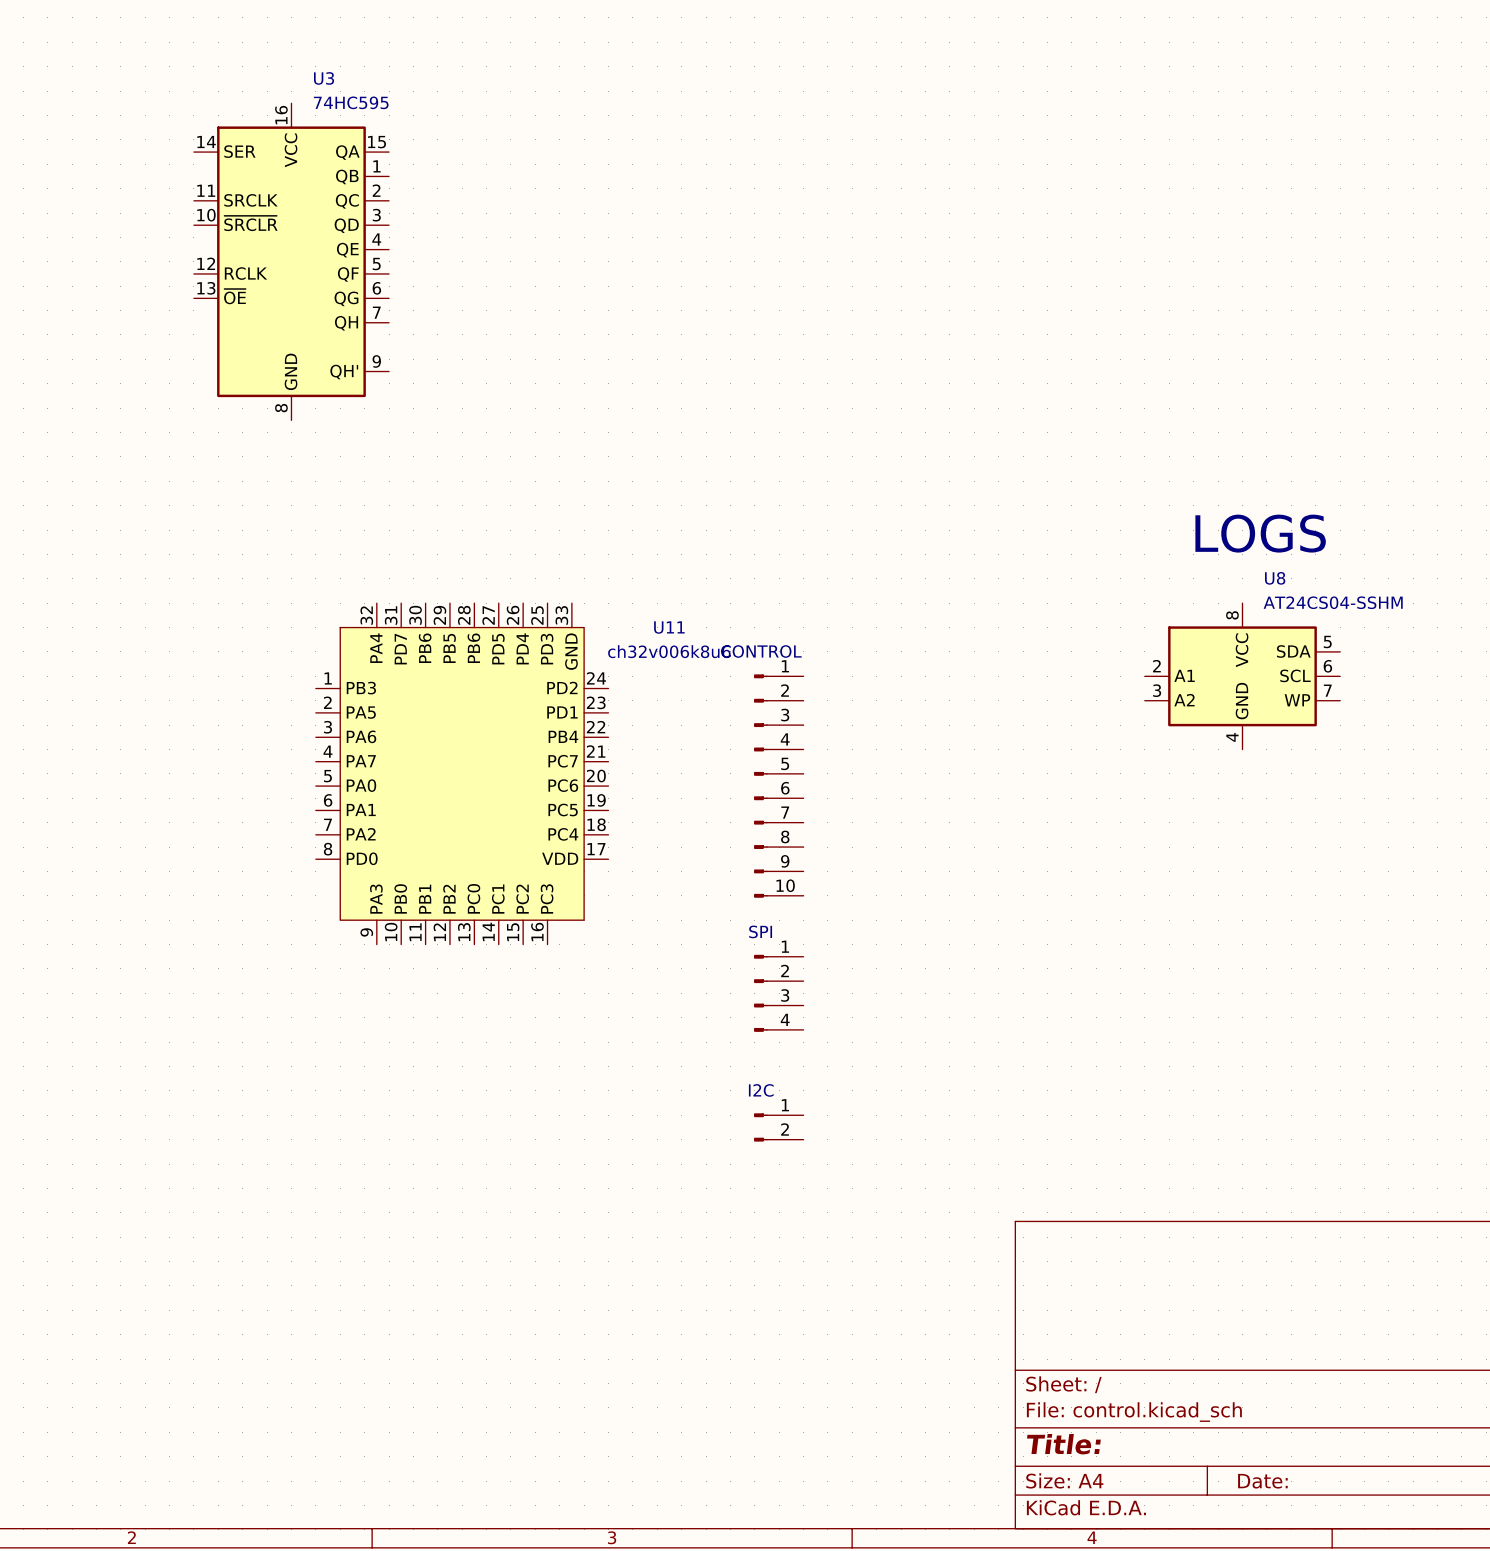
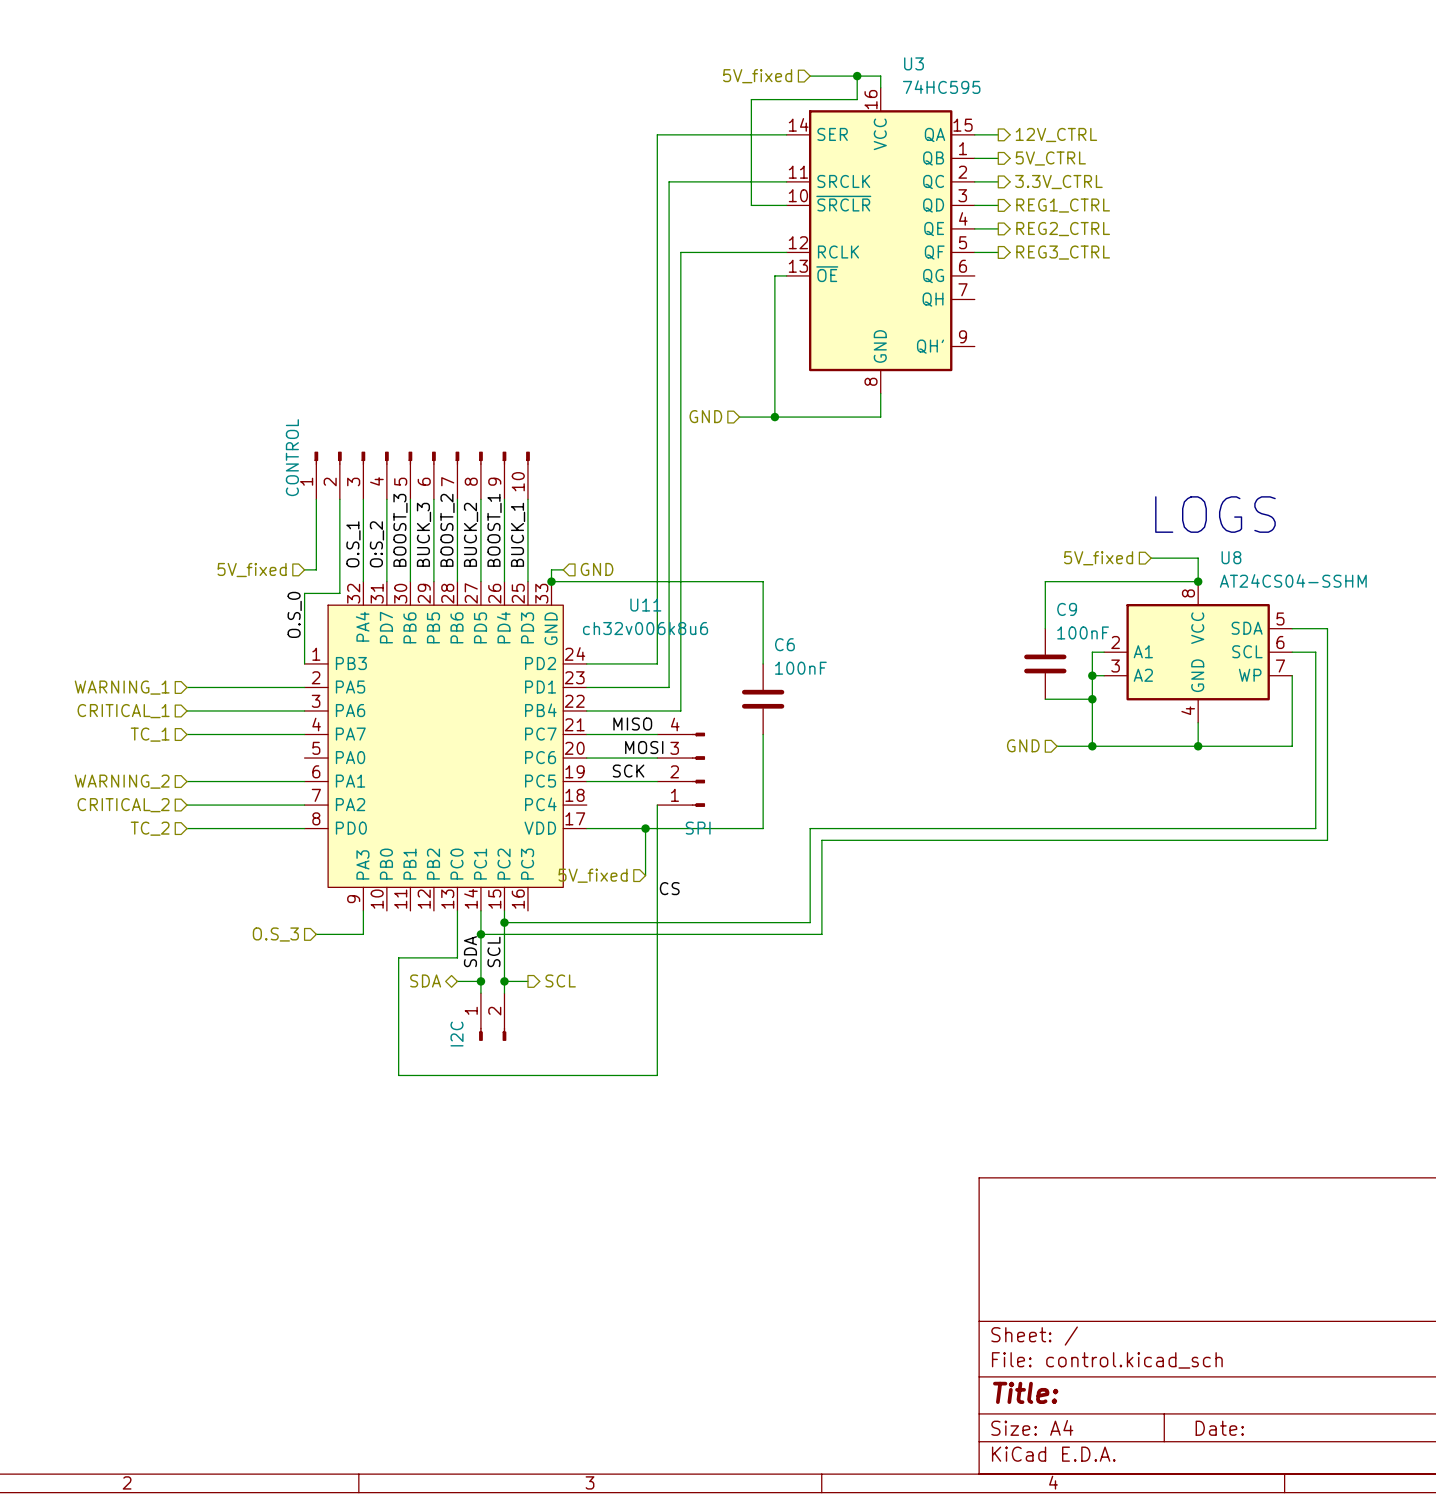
wire: none -> (810, 76) (880, 76) (880, 87)
wire: none -> (857, 76) (857, 99) (751, 99) (751, 205) (786, 205)
junction: none -> (857, 76)
hierarchical label: none -> 5V_fixed (757, 76)
wire: none -> (786, 134) (657, 134) (657, 663) (586, 663)
wire: none -> (974, 134) (998, 134)
hierarchical label: none -> 12V_CTRL (1056, 134)
wire: none -> (974, 158) (998, 158)
hierarchical label: none -> 5V_CTRL (1050, 158)
wire: none -> (786, 181) (669, 181) (669, 687) (586, 687)
wire: none -> (974, 181) (998, 181)
hierarchical label: none -> 3.3V_CTRL (1058, 182)
wire: none -> (974, 205) (998, 205)
hierarchical label: none -> REG1_CTRL (1063, 205)
wire: none -> (974, 228) (998, 228)
hierarchical label: none -> REG2_CTRL (1063, 229)
U3 position: (291, 261) -> (880, 240)
wire: none -> (786, 252) (680, 252) (680, 710) (586, 710)
wire: none -> (974, 252) (998, 252)
hierarchical label: none -> REG3_CTRL (1063, 252)
wire: none -> (786, 275) (774, 275) (774, 417)
wire: none -> (880, 393) (880, 417) (739, 417)
hierarchical label: none -> GND (705, 416)
junction: none -> (774, 417)
part: none -> CONTROL (422, 475)
wire: none -> (316, 499) (316, 569) (304, 569)
wire: none -> (339, 499) (339, 593) (304, 593) (304, 663)
wire: none -> (363, 499) (363, 581)
wire: none -> (386, 499) (386, 581)
wire: none -> (410, 499) (410, 581)
wire: none -> (433, 499) (433, 581)
wire: none -> (457, 499) (457, 581)
wire: none -> (480, 499) (480, 581)
wire: none -> (504, 499) (504, 581)
wire: none -> (527, 499) (527, 581)
label: none -> BOOST_3 (400, 530)
label: none -> BOOST_2 (447, 530)
label: none -> BOOST_1 (494, 530)
label: none -> BUCK_3 (423, 534)
label: none -> BUCK_2 (471, 534)
label: none -> BUCK_1 (518, 534)
label: none -> O.S_1 (353, 544)
label: none -> O:S_2 (376, 544)
wire: none -> (1151, 558) (1198, 558) (1198, 581) (1045, 581) (1045, 628)
hierarchical label: none -> 5V_fixed (1098, 558)
wire: none -> (563, 569) (551, 569) (551, 581) (763, 581) (763, 663)
hierarchical label: none -> GND (597, 569)
hierarchical label: none -> 5V_fixed (252, 570)
junction: none -> (551, 581)
junction: none -> (1198, 581)
label: none -> O.S_0 (294, 614)
wire: none -> (1292, 628) (1327, 628) (1327, 840) (821, 840) (821, 934) (480, 934)
wire: none -> (1104, 652) (1092, 652) (1092, 746)
wire: none -> (1292, 652) (1315, 652) (1315, 828) (810, 828) (810, 922) (504, 922)
C9: none -> 100nF (1045, 663)
wire: none -> (1092, 675) (1104, 675)
junction: none -> (1092, 675)
wire: none -> (1292, 675) (1292, 746) (1057, 746)
wire: none -> (187, 687) (304, 687)
hierarchical label: none -> WARNING_1 (122, 687)
C6: none -> 100nF (763, 699)
wire: none -> (1045, 699) (1092, 699)
junction: none -> (1092, 699)
wire: none -> (187, 710) (304, 710)
hierarchical label: none -> CRITICAL_1 (123, 711)
wire: none -> (1198, 722) (1198, 746)
label: none -> MISO (632, 724)
wire: none -> (187, 734) (304, 734)
wire: none -> (586, 734) (657, 734)
wire: none -> (763, 734) (763, 828) (586, 828)
hierarchical label: none -> TC_1 (150, 734)
hierarchical label: none -> GND (1023, 745)
junction: none -> (1092, 746)
junction: none -> (1198, 746)
label: none -> MOSI (644, 747)
wire: none -> (586, 758) (657, 758)
part: CONTROL (778, 786) -> none
label: none -> SCK (628, 771)
wire: none -> (187, 781) (304, 781)
wire: none -> (586, 781) (657, 781)
hierarchical label: none -> WARNING_2 (122, 781)
wire: none -> (187, 805) (304, 805)
wire: none -> (657, 805) (657, 1075) (398, 1075) (398, 957) (457, 957) (457, 910)
hierarchical label: none -> CRITICAL_2 (123, 805)
wire: none -> (187, 828) (304, 828)
wire: none -> (645, 828) (645, 875)
junction: none -> (645, 828)
hierarchical label: none -> TC_2 (150, 828)
hierarchical label: none -> 5V_fixed (593, 875)
label: none -> CS (669, 888)
wire: none -> (363, 910) (363, 934) (316, 934)
wire: none -> (480, 910) (480, 993)
wire: none -> (504, 910) (504, 993)
junction: none -> (504, 922)
junction: none -> (480, 934)
hierarchical label: none -> O.S_3 (275, 934)
label: none -> SDA (470, 951)
label: none -> SCL (493, 951)
part rotation: 0° (760, 993) -> 180° (698, 769)
part position: (778, 993) -> (681, 769)
hierarchical label: none -> SDA (425, 980)
wire: none -> (457, 981) (480, 981)
junction: none -> (480, 981)
wire: none -> (504, 981) (527, 981)
junction: none -> (504, 981)
hierarchical label: none -> SCL (560, 980)
part: none -> I2C (492, 1017)
part: I2C (778, 1127) -> none

